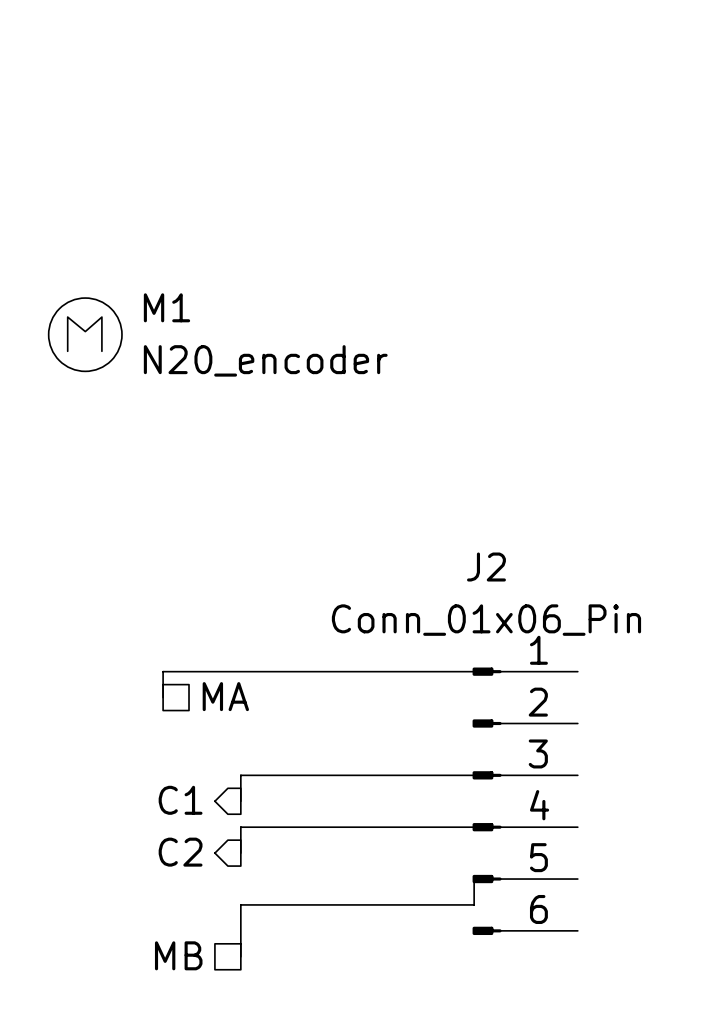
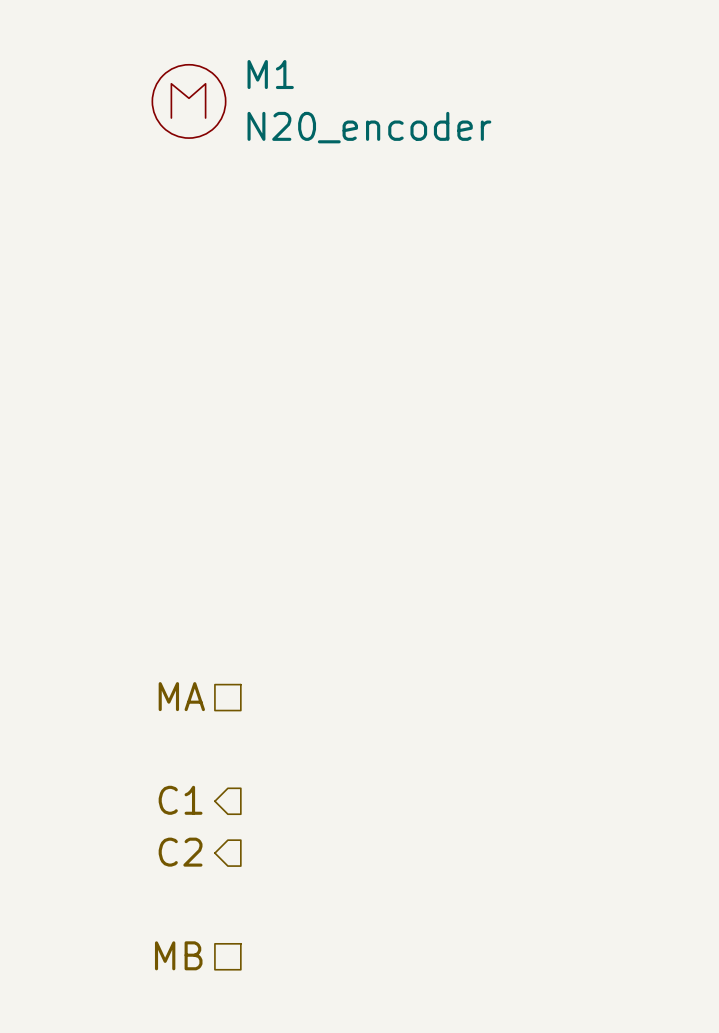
M1 position: (85, 334) -> (189, 101)
wire: (500, 671) (163, 671) (163, 697) -> none
hierarchical label rotation: 0° (225, 696) -> 180° (181, 696)
wire: (500, 775) (240, 775) (240, 801) -> none
J2: Conn_01x06_Pin (525, 801) -> none
wire: (500, 827) (240, 827) (240, 853) -> none
wire: (474, 879) (474, 904) (240, 904) (240, 956) -> none

